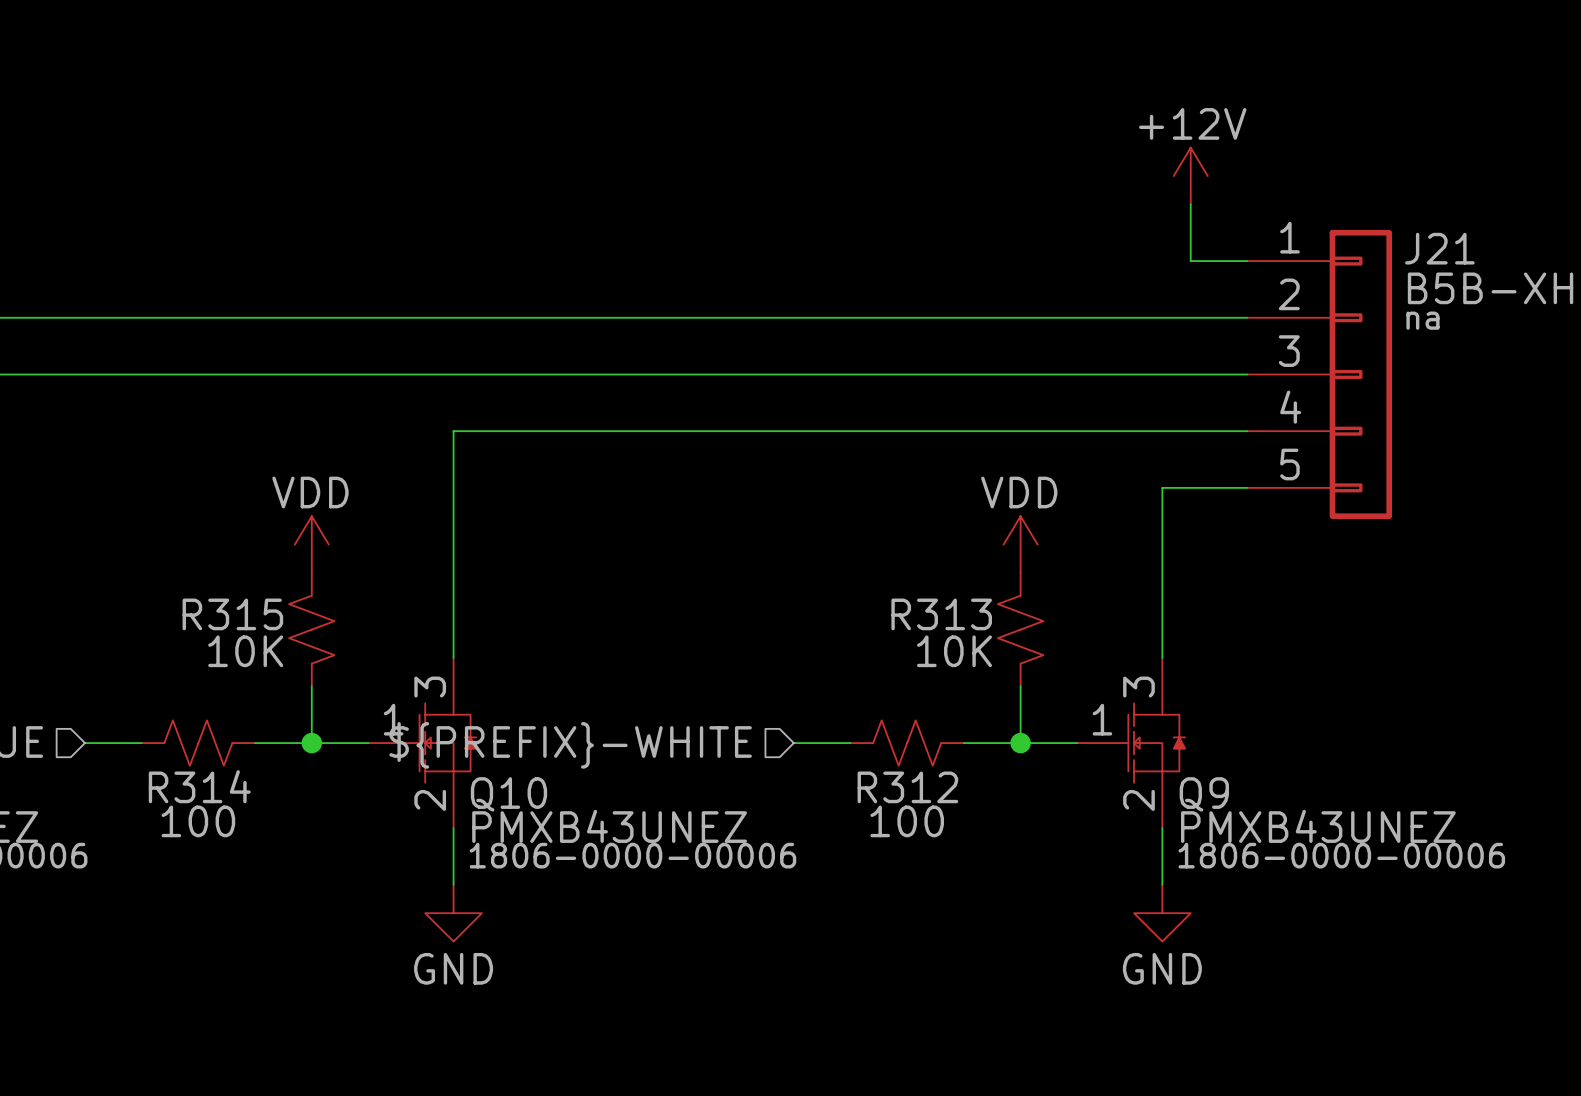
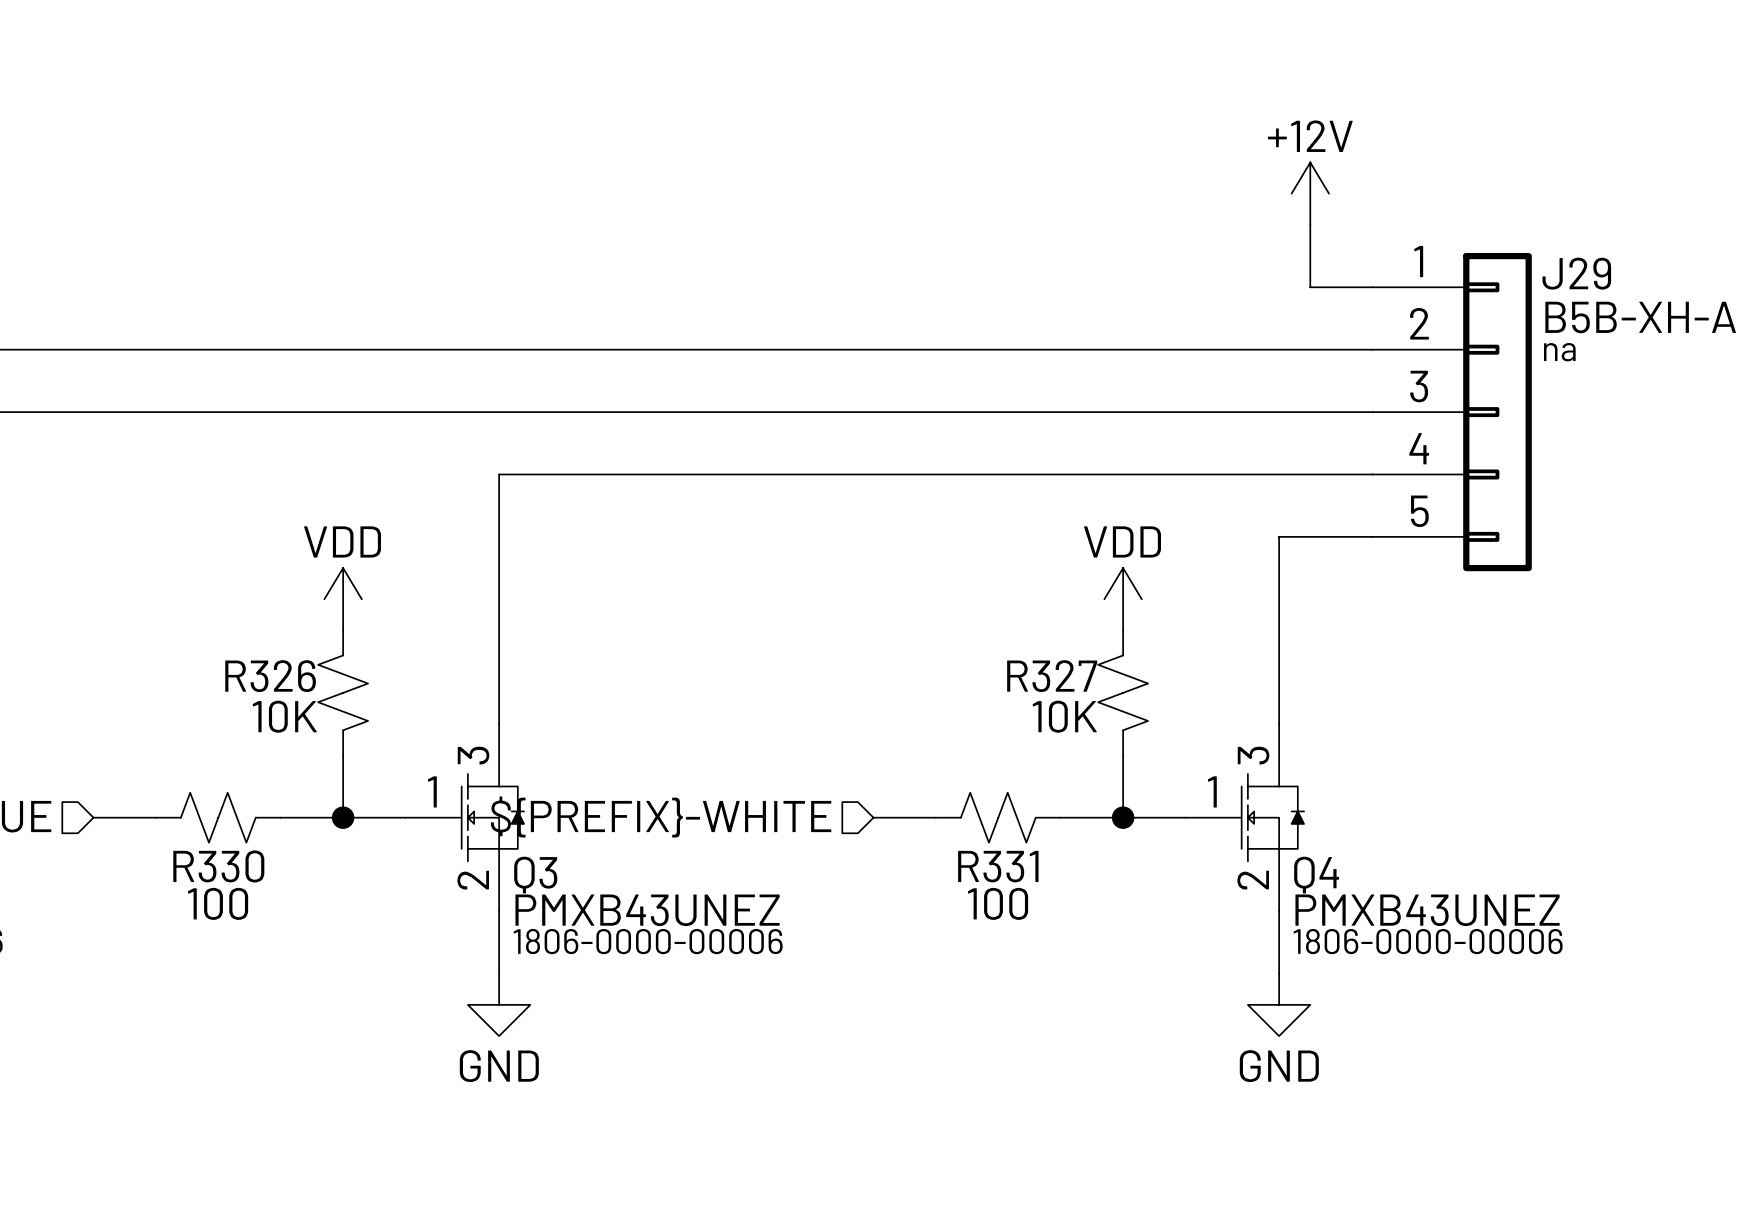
J21 name: J21 (1439, 248) -> J29 (1576, 273)
R315 name: R315 (232, 614) -> R326 (270, 676)
R313 name: R313 (941, 614) -> R327 (1052, 676)
R314 name: R314 (199, 786) -> R330 (218, 866)
R312 name: R312 (907, 787) -> R331 (998, 866)
Q10 name: Q10 (508, 794) -> Q3 (535, 875)
Q9 name: Q9 (1204, 794) -> Q4 (1316, 875)

